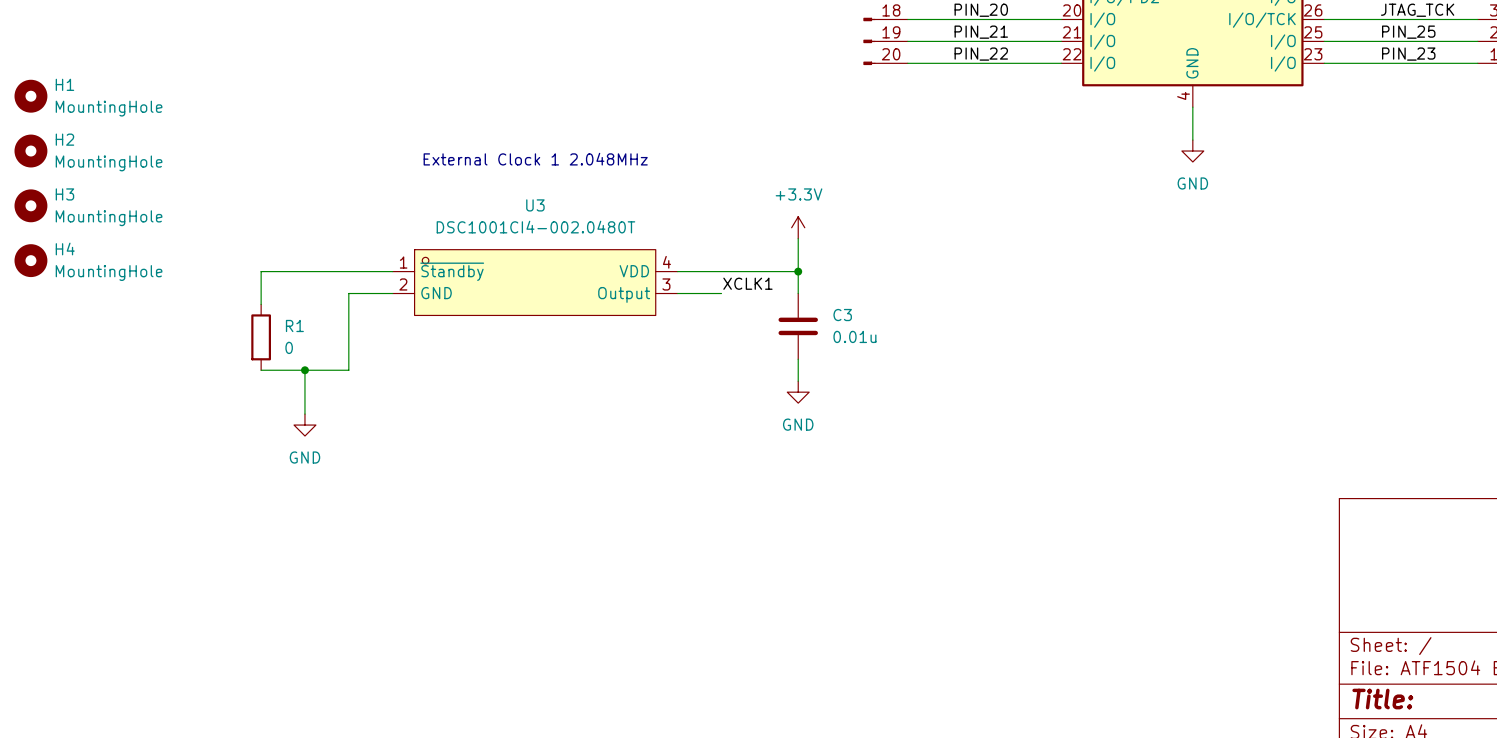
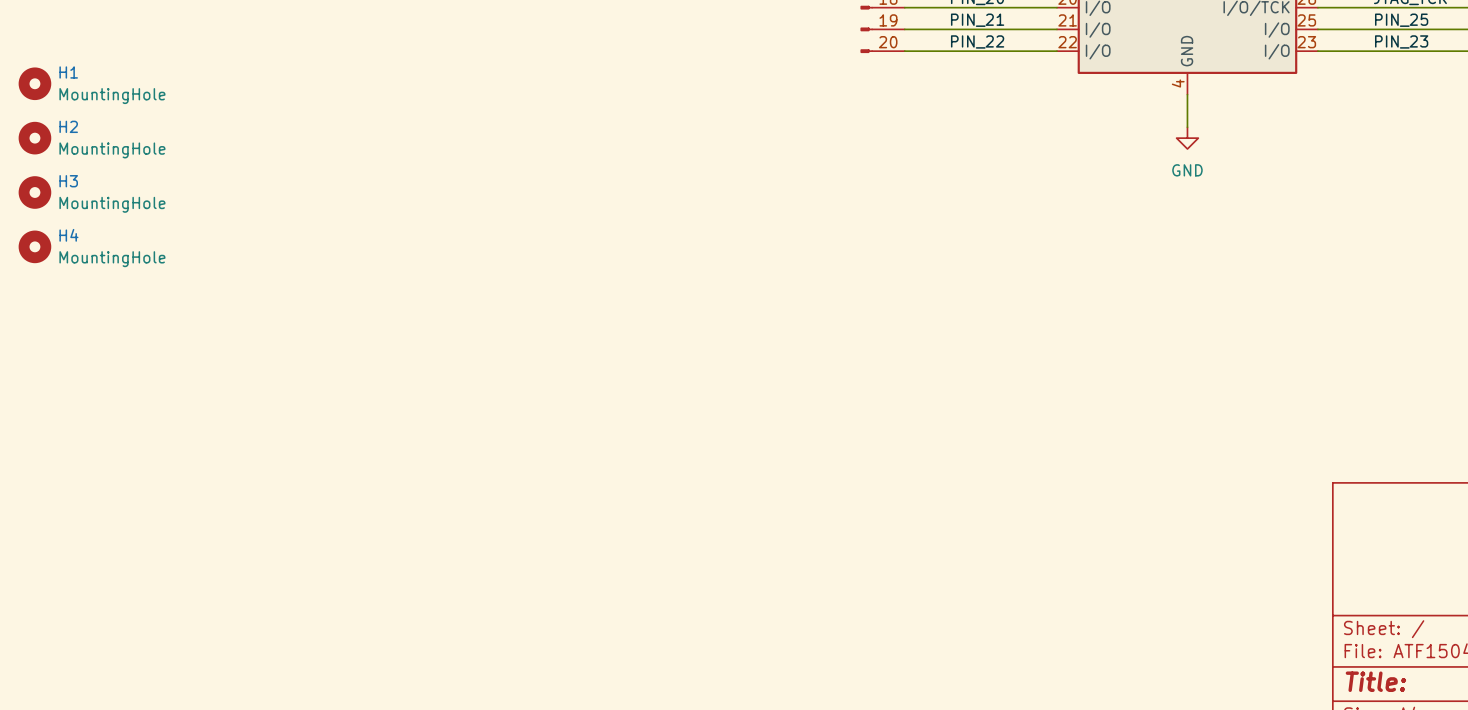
text: External Clock 1 2.048MHz (535, 159) -> none
power symbol: +3.3V (798, 227) -> none
wire: (798, 238) (798, 293) -> none
wire: (392, 271) (261, 271) (261, 304) -> none
wire: (677, 271) (798, 271) -> none
junction: (798, 271) -> none
U3: DSC1001CI4-002.0480T (535, 282) -> none
label: XCLK1 (747, 283) -> none
wire: (392, 293) (348, 293) (348, 370) (261, 370) -> none
wire: (677, 293) (721, 293) -> none
C3: 0.01u (798, 326) -> none
R1: 0 (261, 337) -> none
wire: (798, 359) (798, 381) -> none
wire: (304, 370) (304, 414) -> none
junction: (304, 370) -> none
power symbol: GND (798, 392) -> none
power symbol: GND (304, 425) -> none

